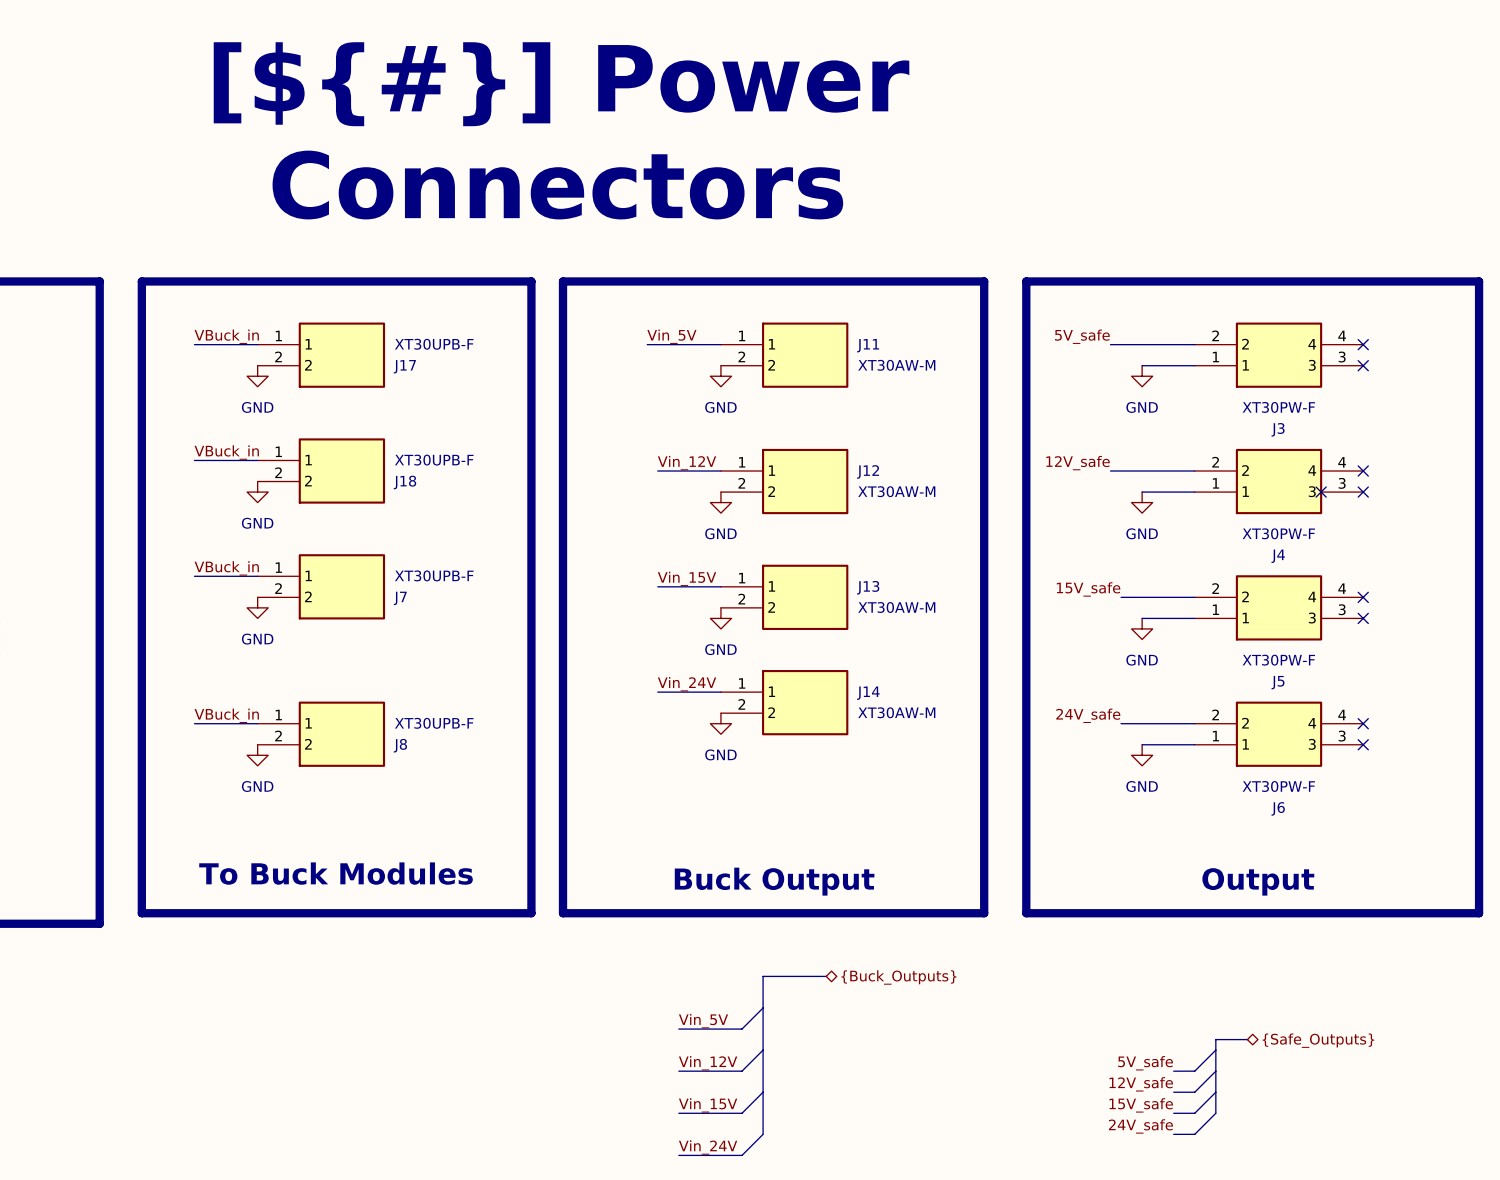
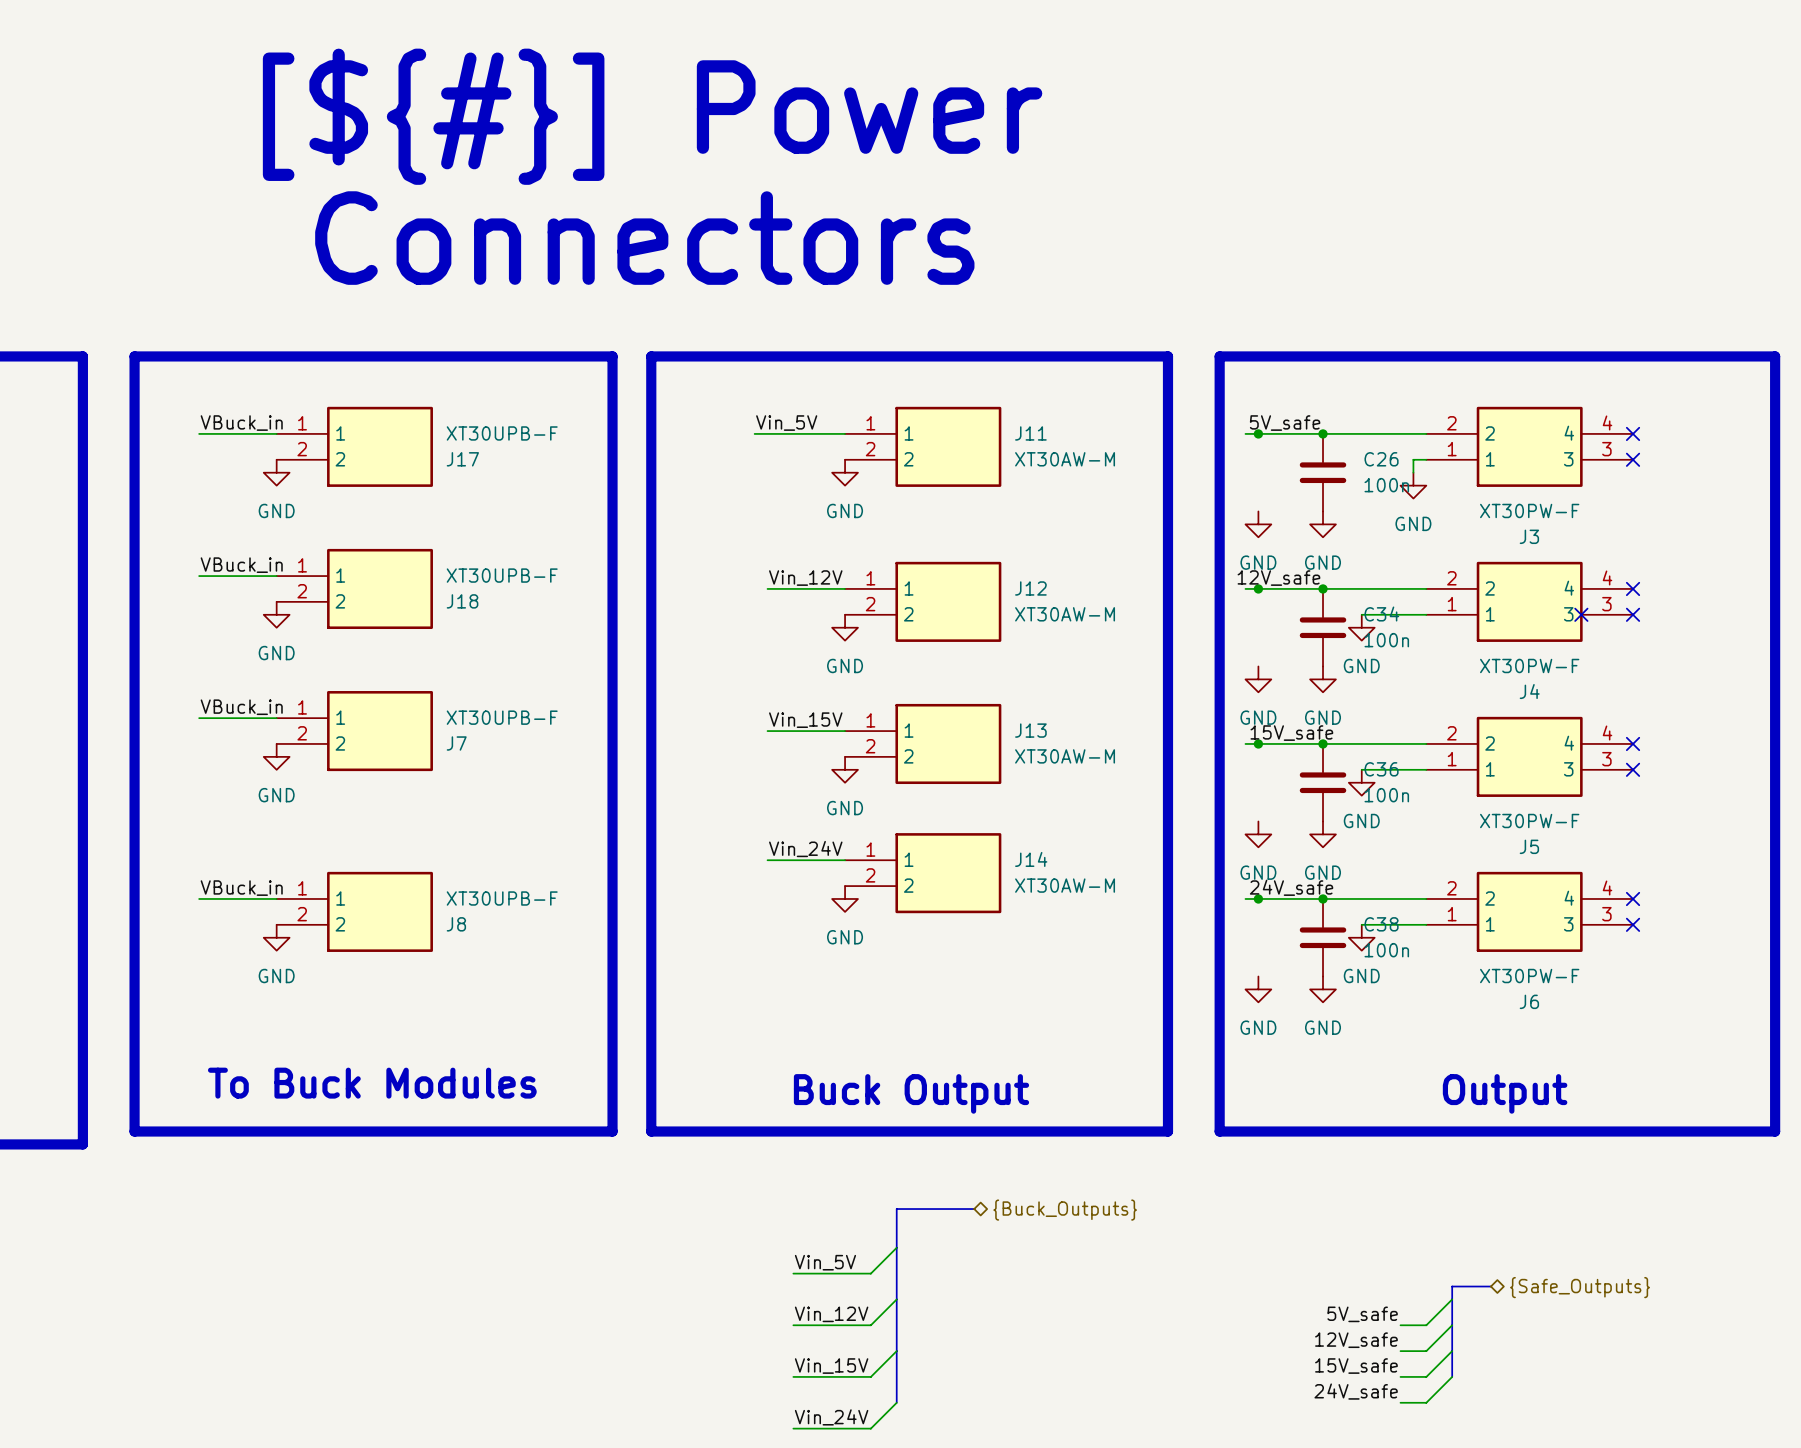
wire: none -> (1245, 433) (1323, 433)
junction: none -> (1258, 433)
junction: none -> (1323, 433)
wire: (1142, 365) (1184, 365) -> (1413, 472) (1413, 459)
C26: none -> 100n (1323, 472)
power symbol: GND (1142, 376) -> none
power symbol: none -> GND (1413, 485)
power symbol: none -> GND (1258, 524)
power symbol: none -> GND (1323, 524)
wire: none -> (1245, 588) (1323, 588)
junction: none -> (1258, 588)
junction: none -> (1323, 588)
C34: none -> 100n (1323, 627)
power symbol: none -> GND (1258, 679)
power symbol: none -> GND (1323, 679)
wire: none -> (1245, 743) (1335, 743)
junction: none -> (1258, 743)
junction: none -> (1323, 743)
C36: none -> 100n (1323, 782)
power symbol: none -> GND (1258, 834)
power symbol: none -> GND (1323, 834)
wire: none -> (1245, 898) (1335, 898)
junction: none -> (1258, 898)
junction: none -> (1323, 898)
C38: none -> 100n (1323, 937)
power symbol: none -> GND (1258, 989)
power symbol: none -> GND (1323, 989)

